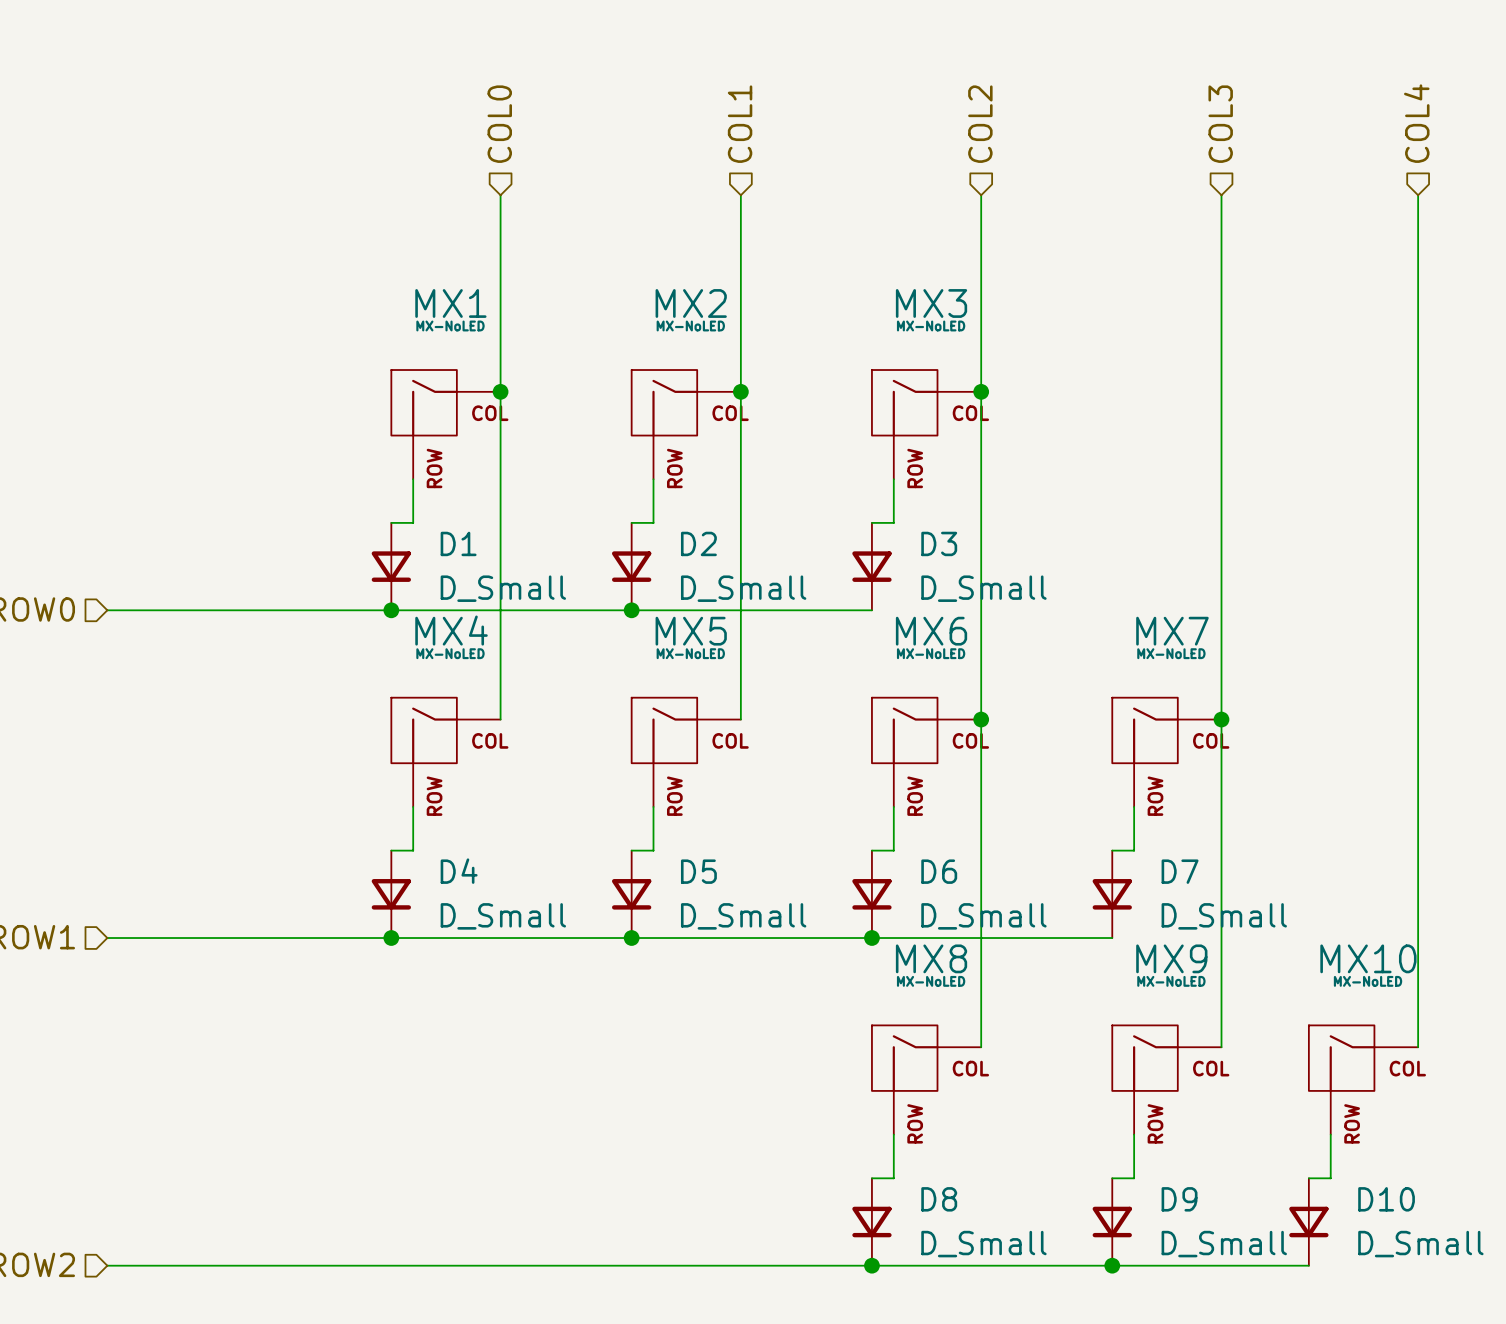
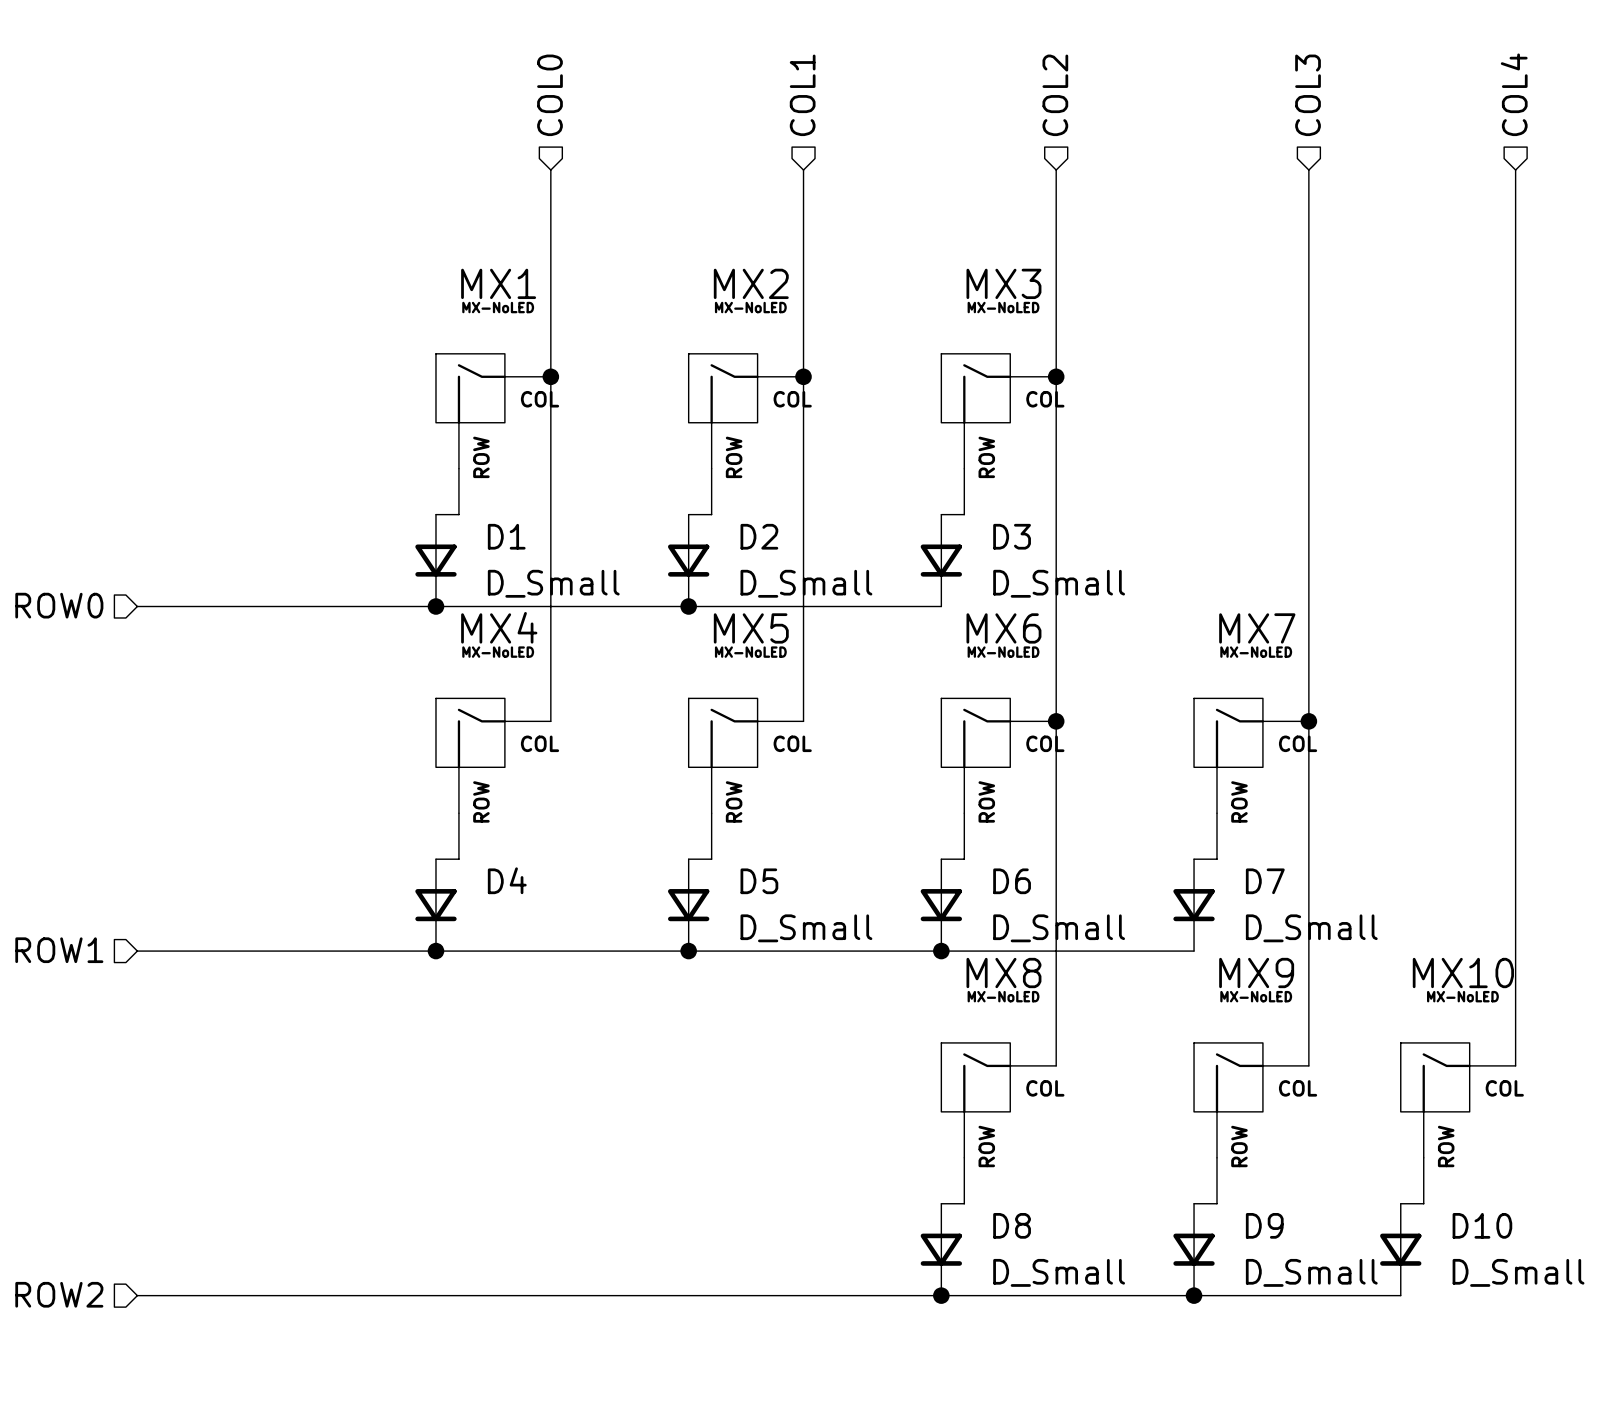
D4 value: D_Small (503, 916) -> none

